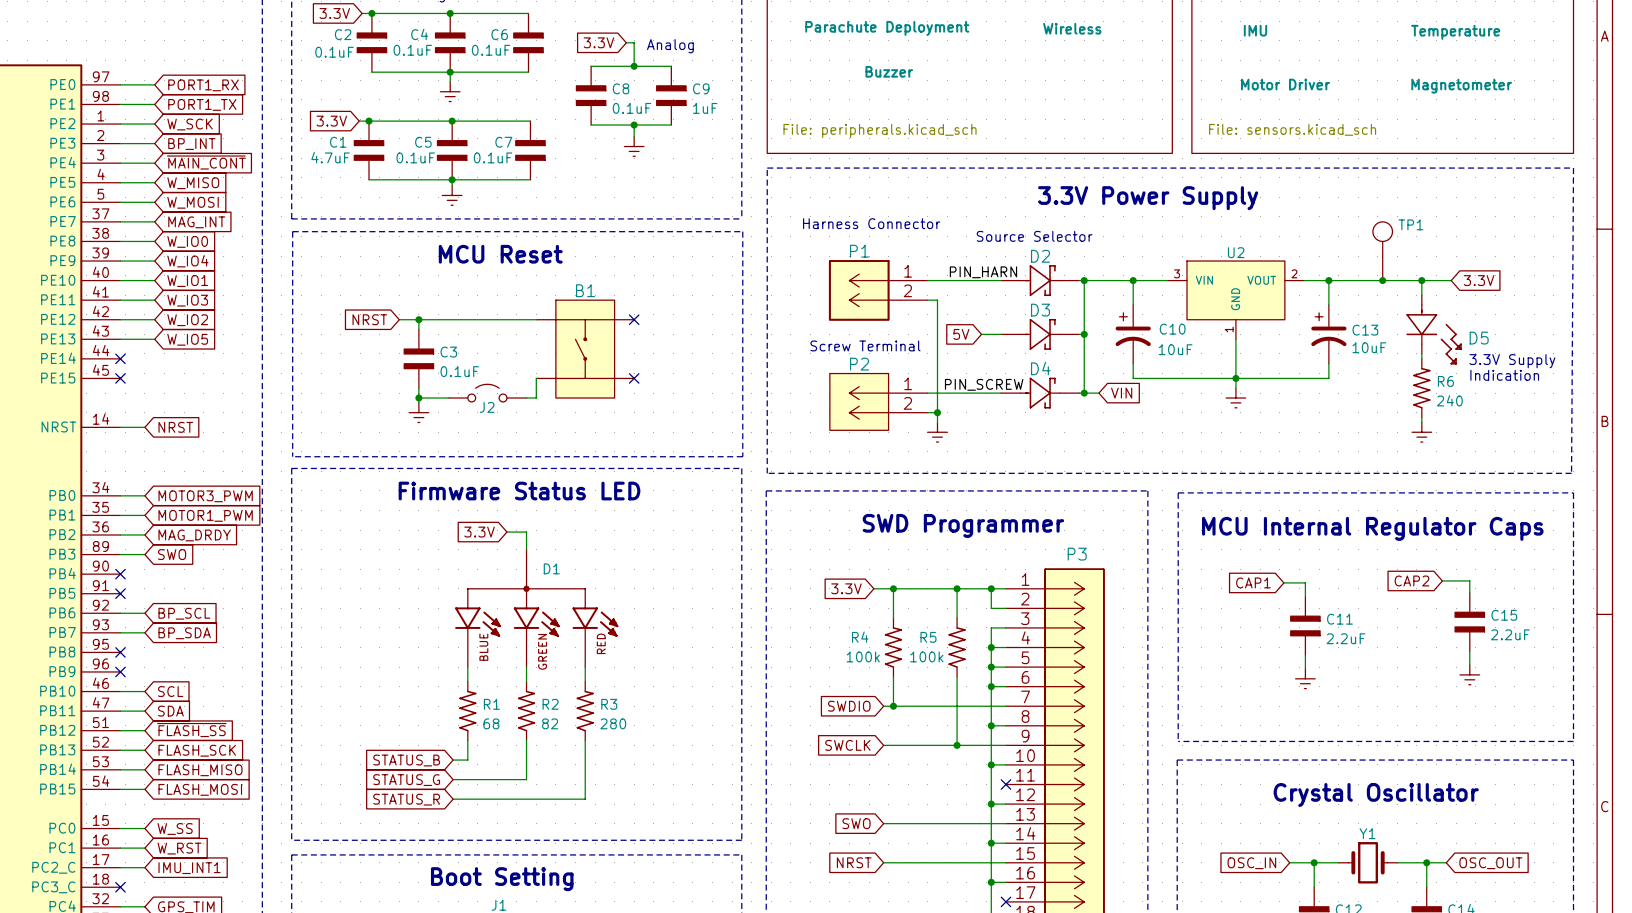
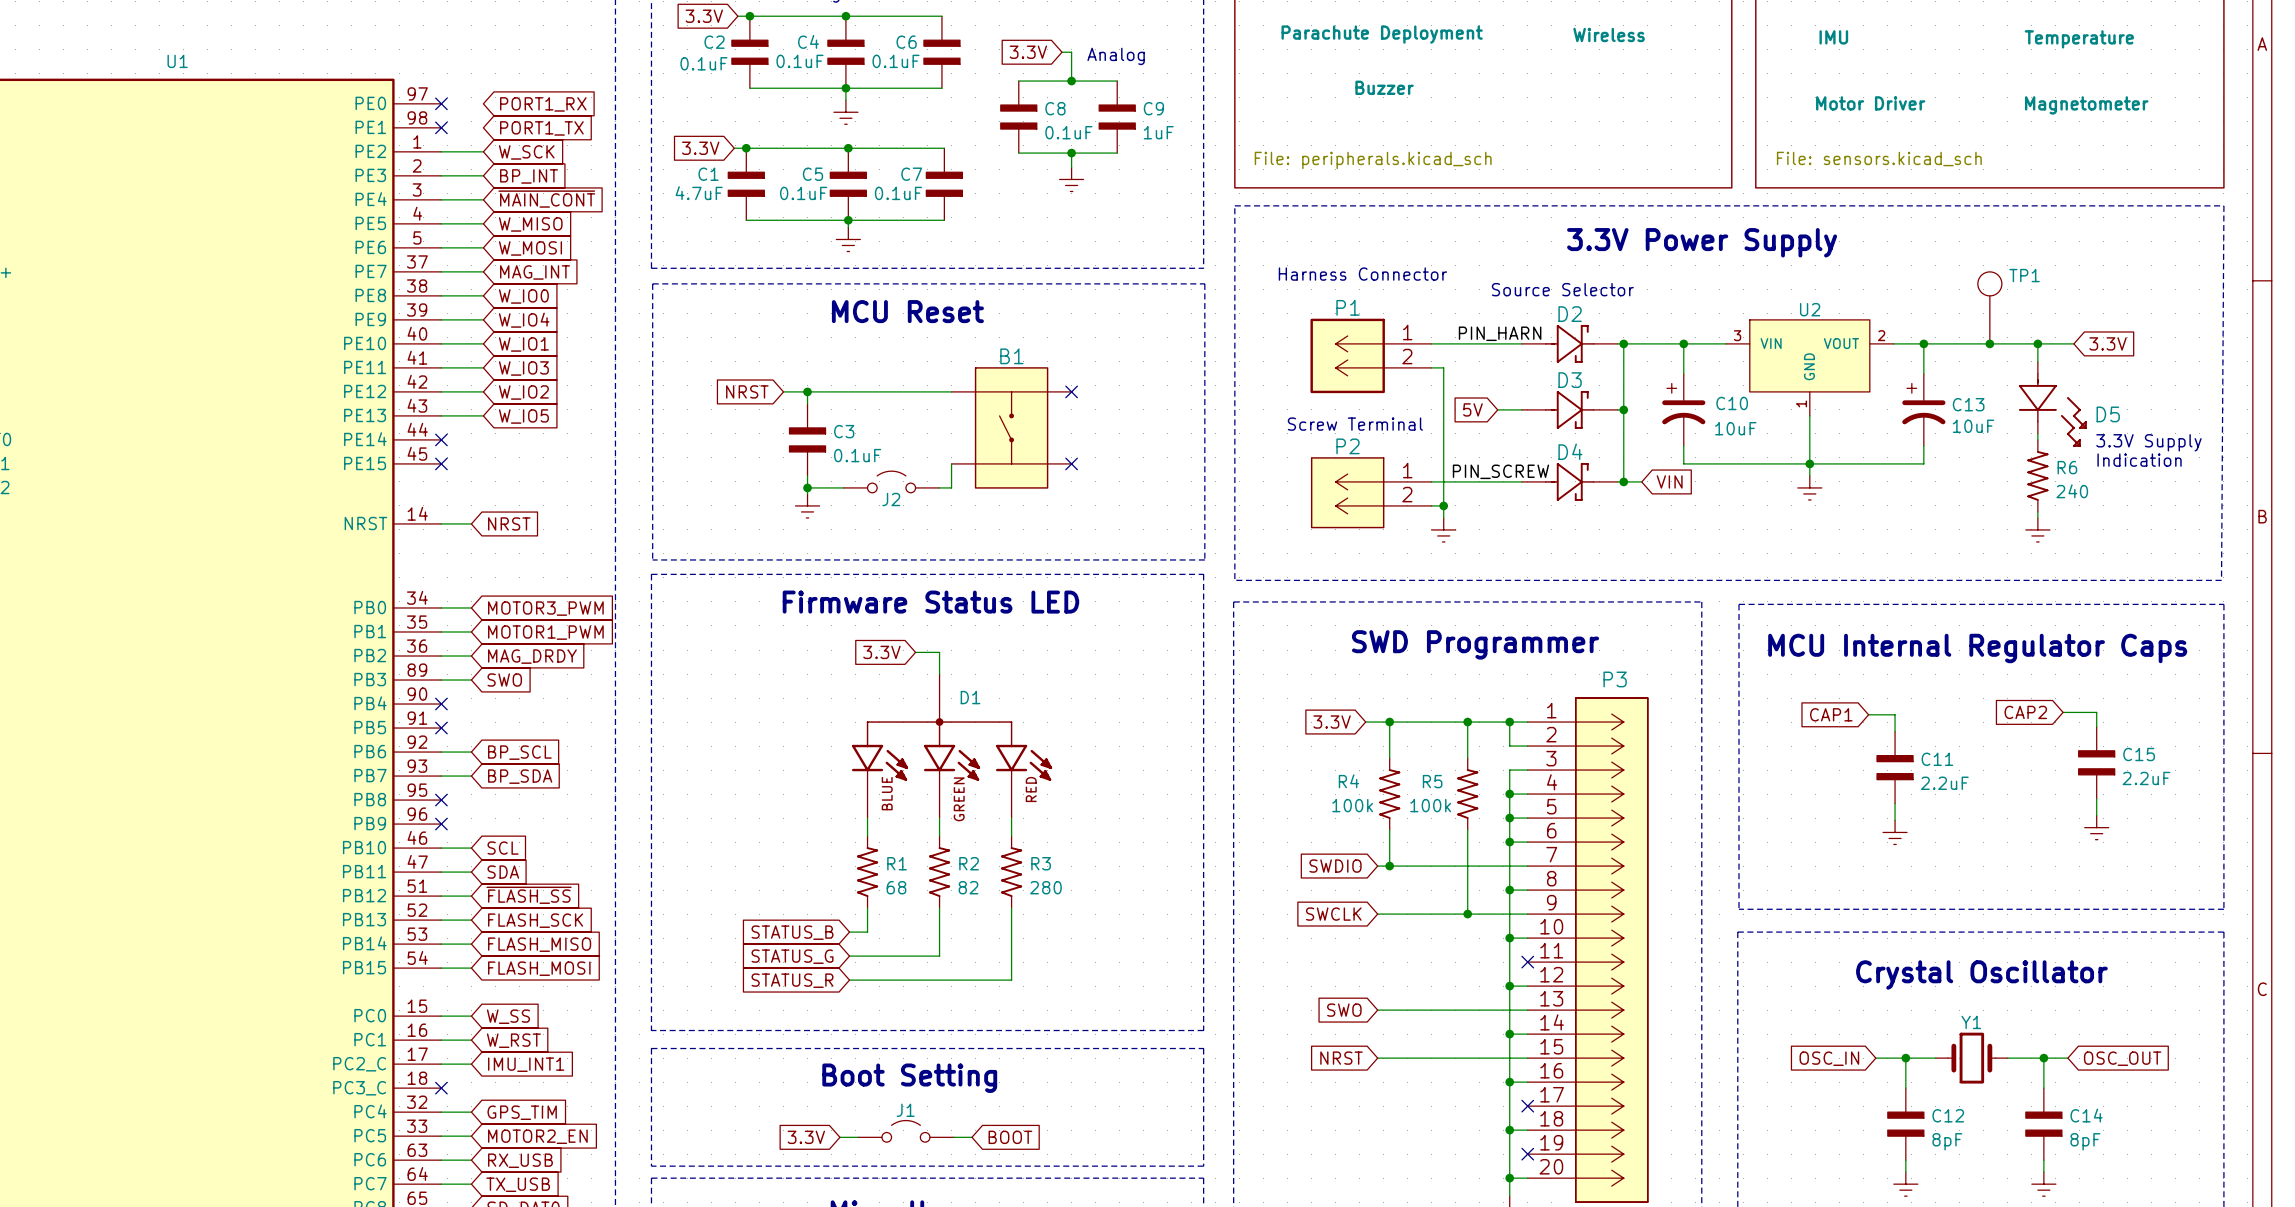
wire: (120, 84) (154, 84) -> none
no-connect mark: none -> (441, 103)
wire: (120, 104) (154, 104) -> none
no-connect mark: none -> (441, 127)

